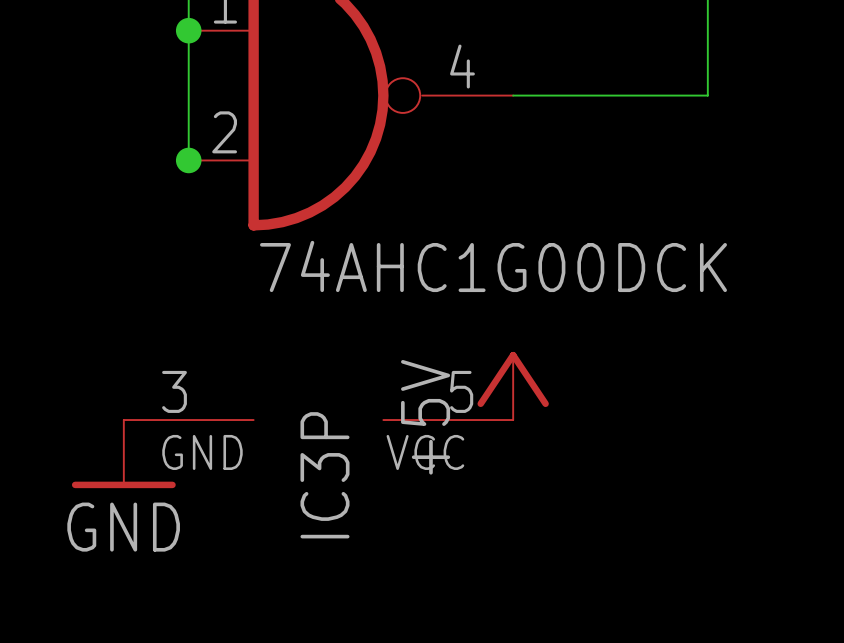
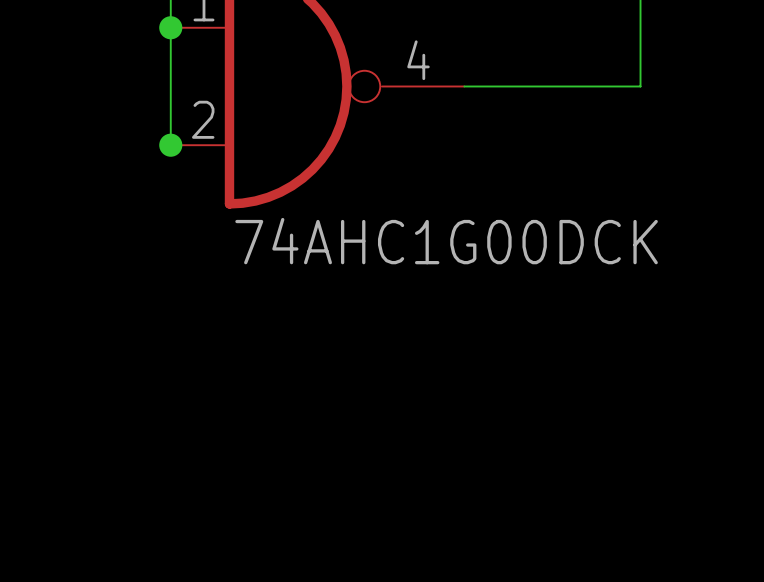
power symbol: +5V (513, 385) -> none
IC3P: (318, 420) -> none
power symbol: GND (123, 454) -> none

